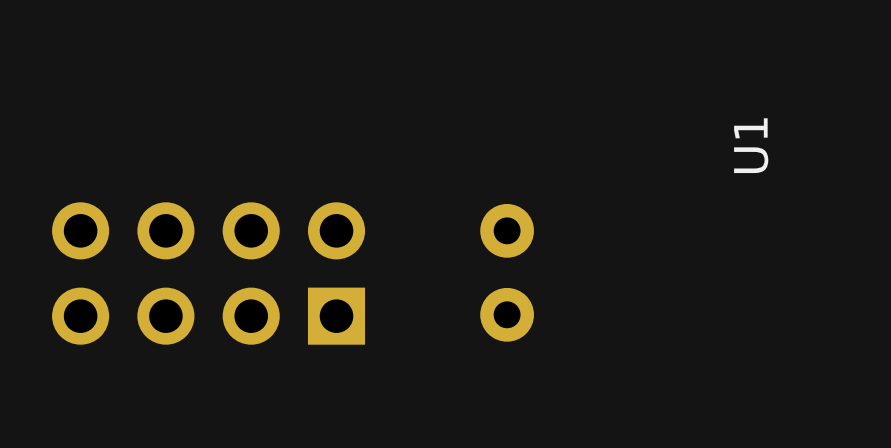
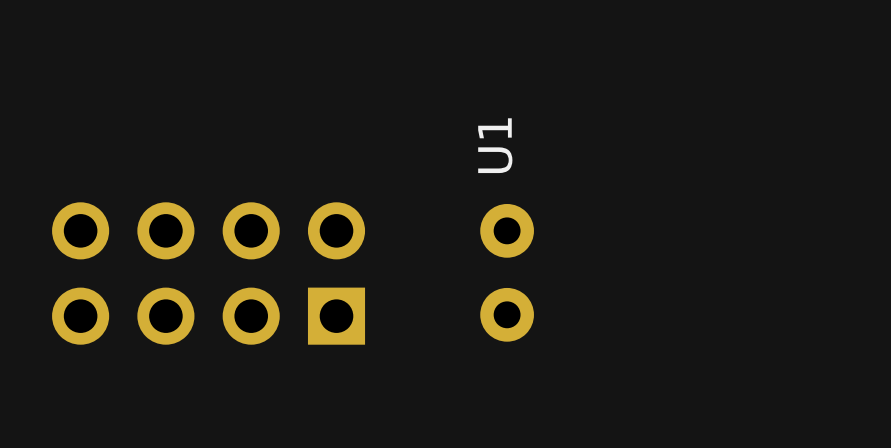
text position: U1 (751, 145) -> U1 (495, 145)

